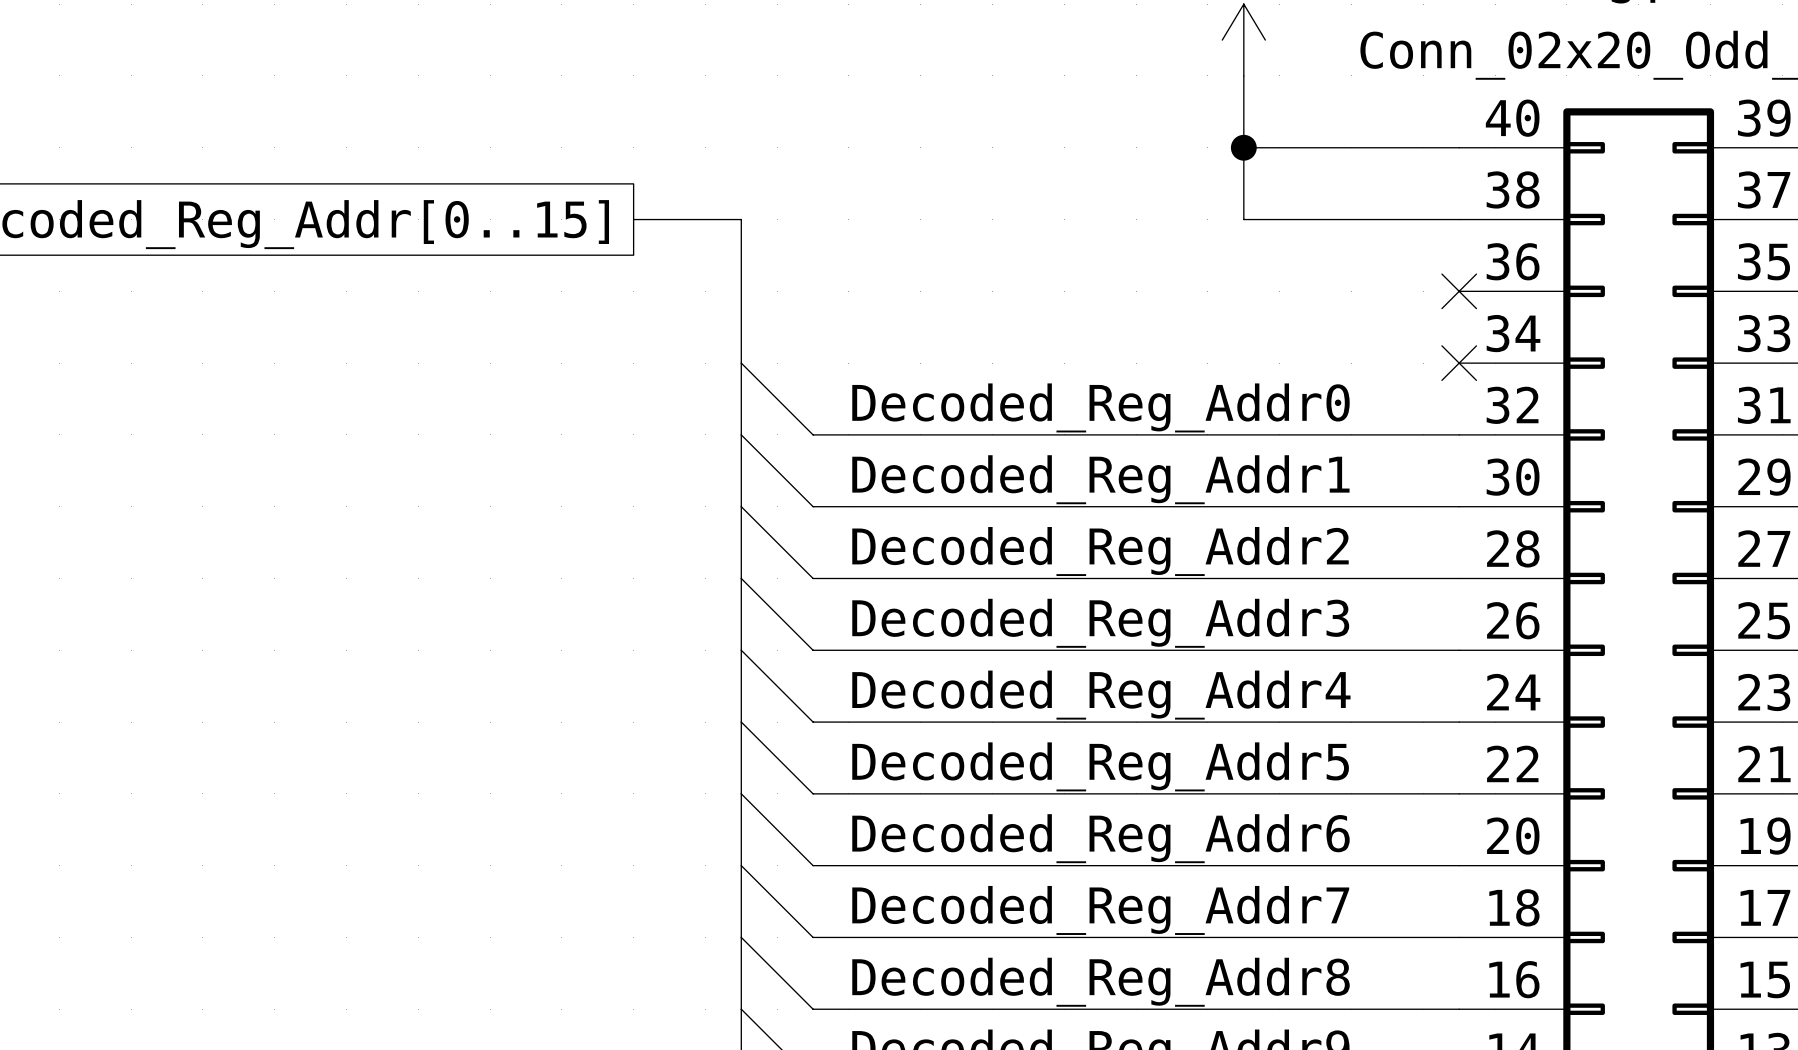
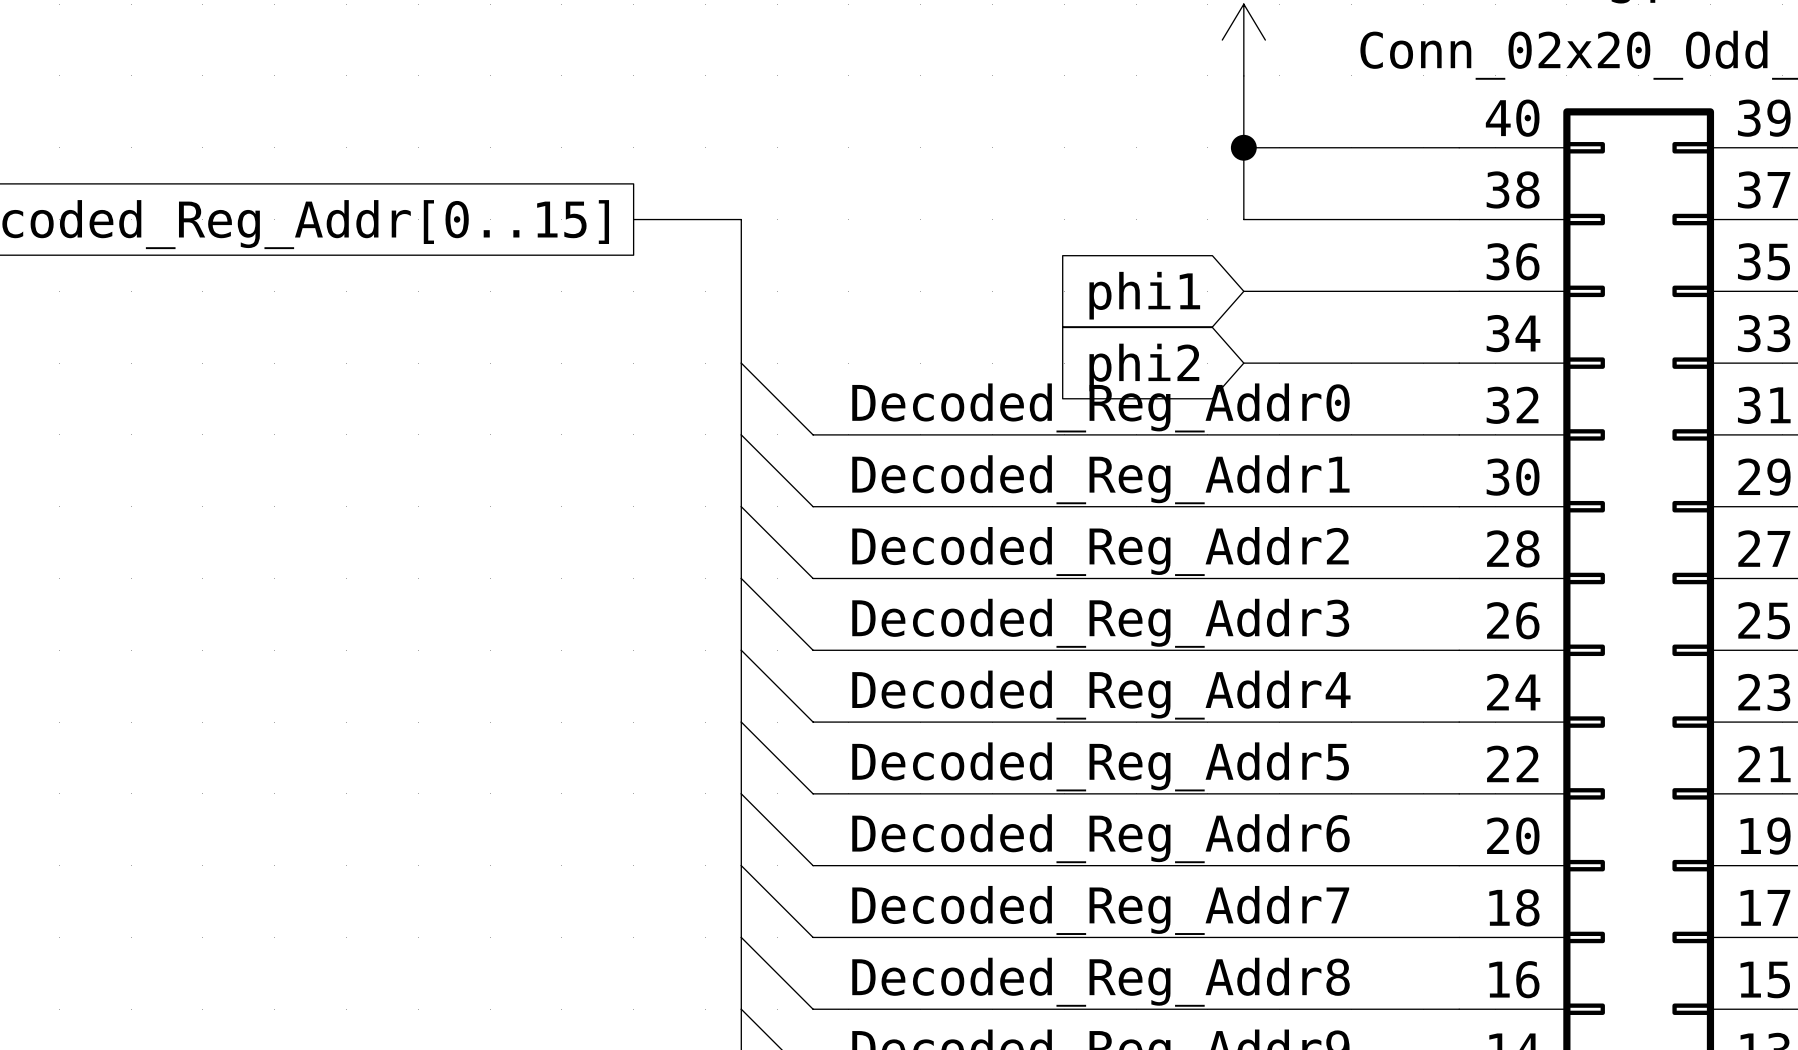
wire: none -> (1243, 291) (1459, 291)
no-connect mark: (1459, 291) -> none
global label: none -> phi1 (1144, 295)
wire: none -> (1243, 363) (1459, 363)
no-connect mark: (1459, 363) -> none
global label: none -> phi2 (1144, 367)

